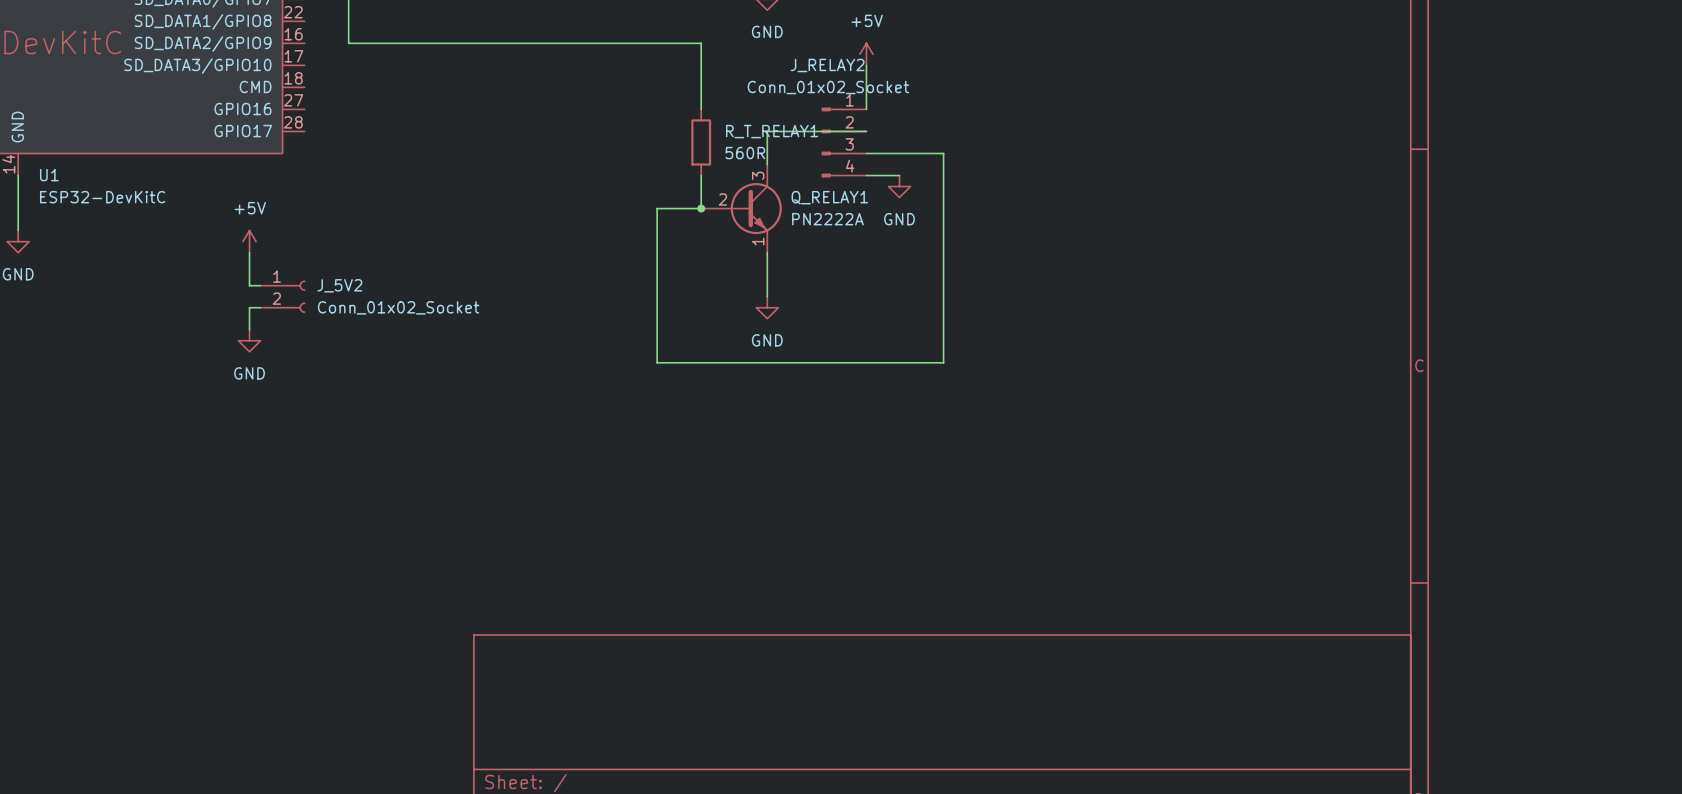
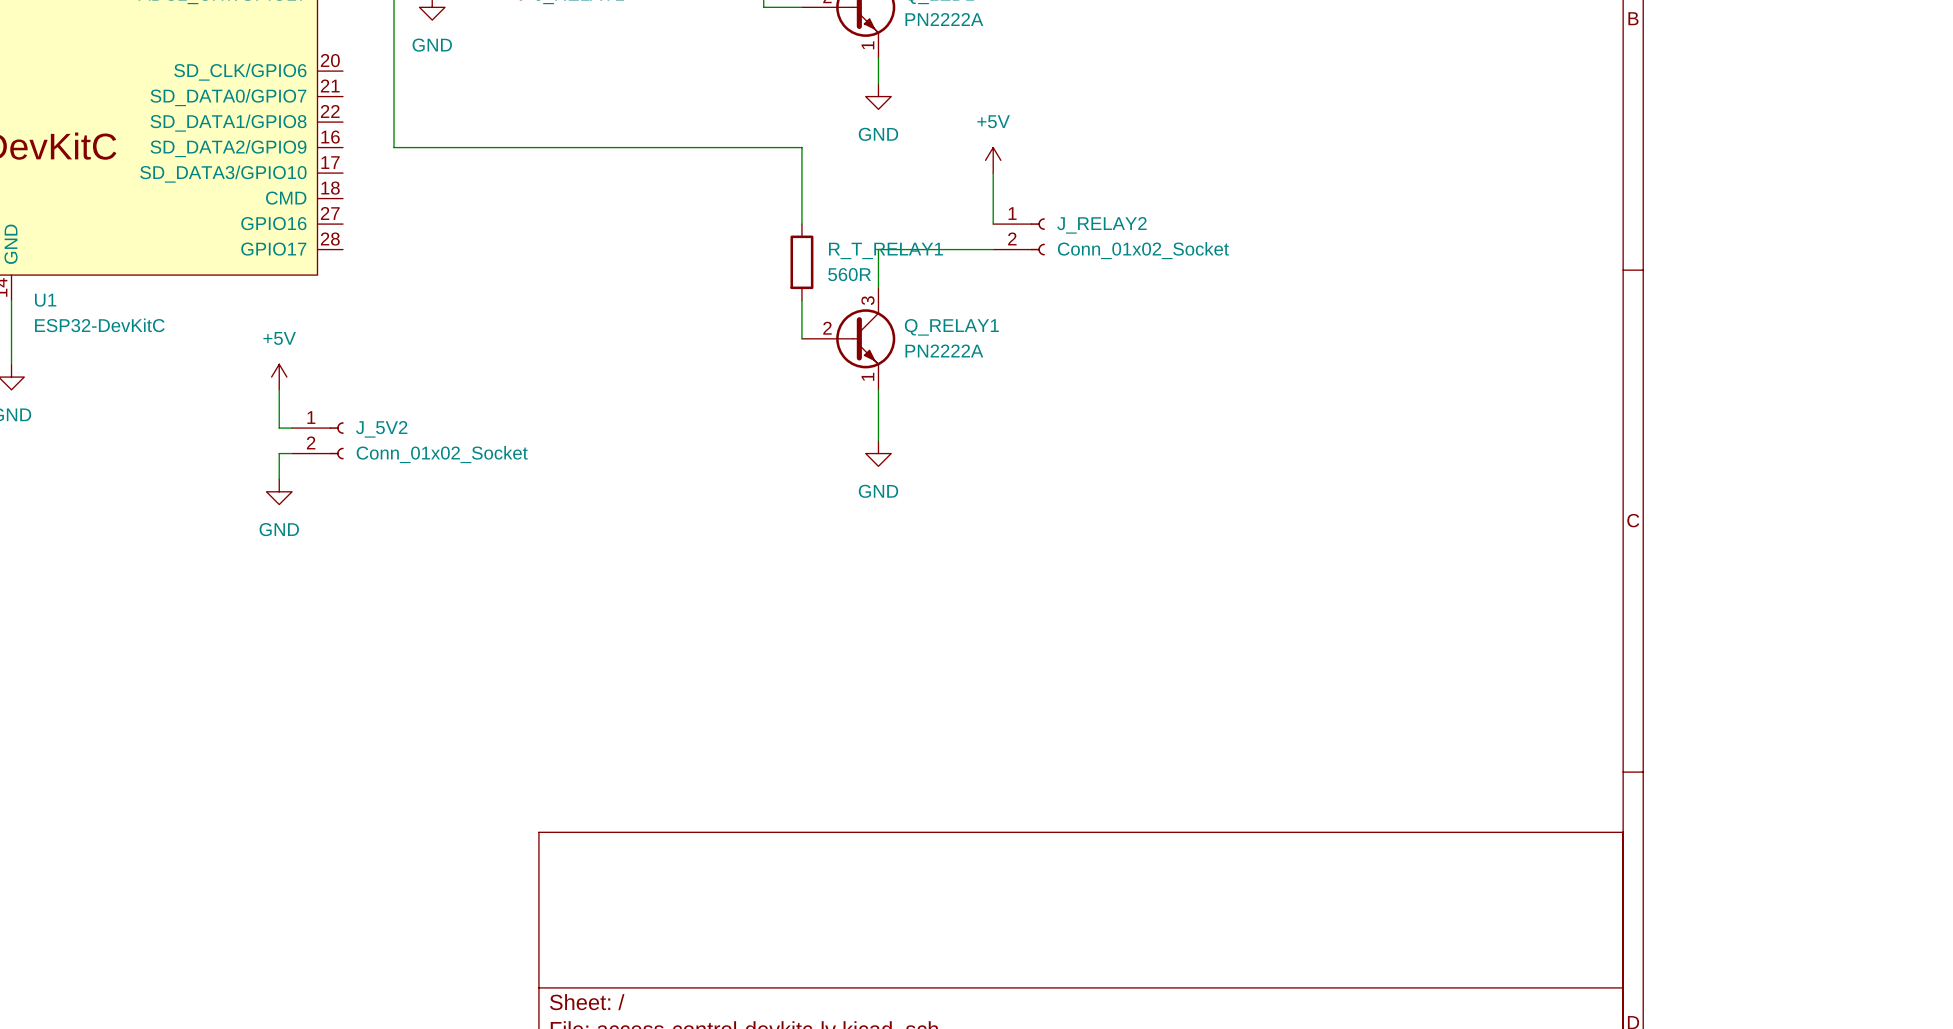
J_RELAY2 name position: J_RELAY2 (827, 65) -> J_RELAY2 (1101, 225)
J_RELAY2 value position: Conn_01x02_Socket (828, 87) -> Conn_01x02_Socket (1143, 250)
J_RELAY2 symbol: [821, 107, 867, 178] -> [993, 218, 1045, 256]
wire: (866, 153) (943, 153) (943, 362) (657, 362) (657, 208) (701, 208) -> none
wire: (866, 175) (899, 175) -> none
power symbol: GND (899, 186) -> none
junction: (701, 208) -> none

